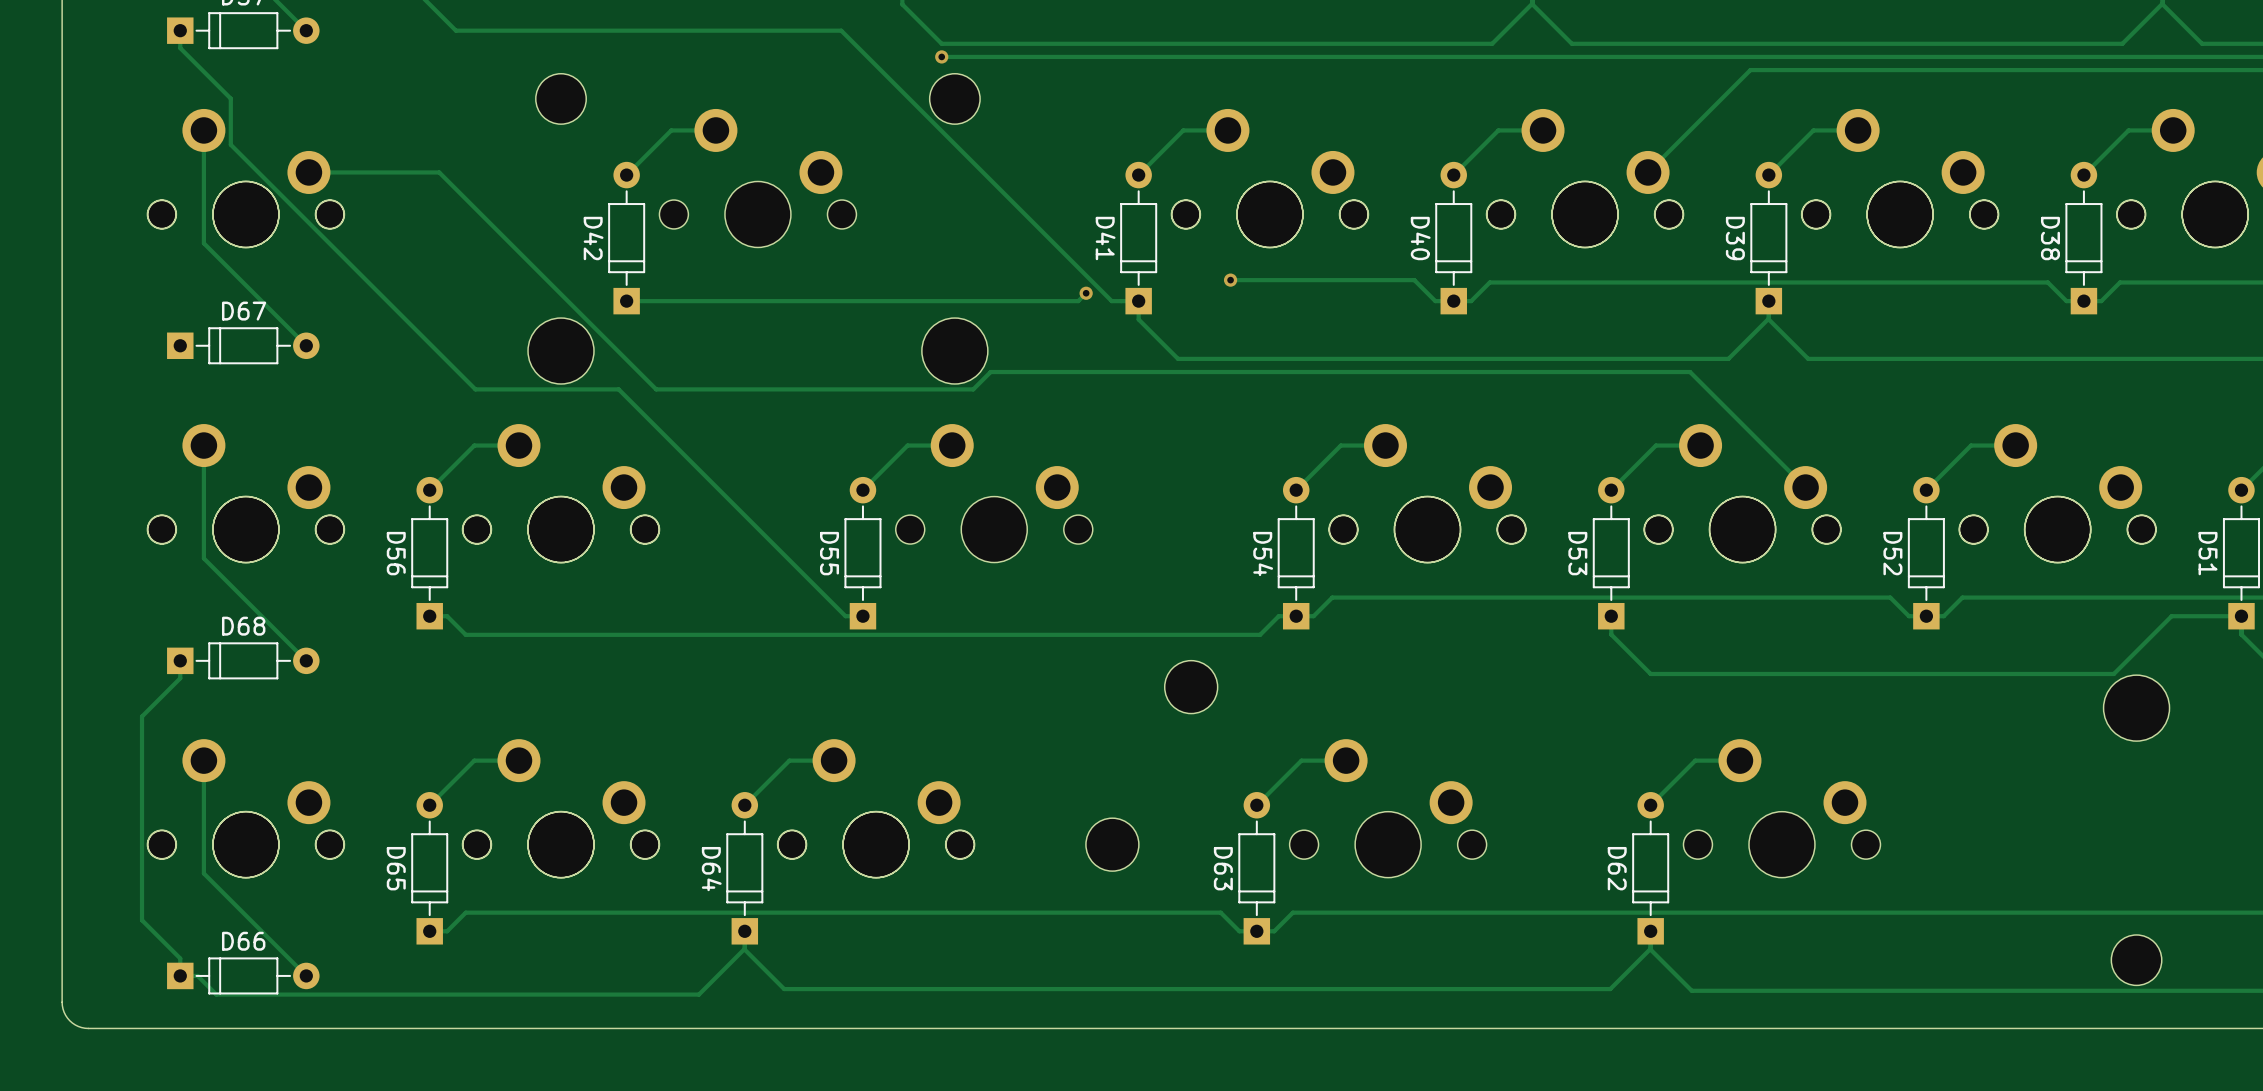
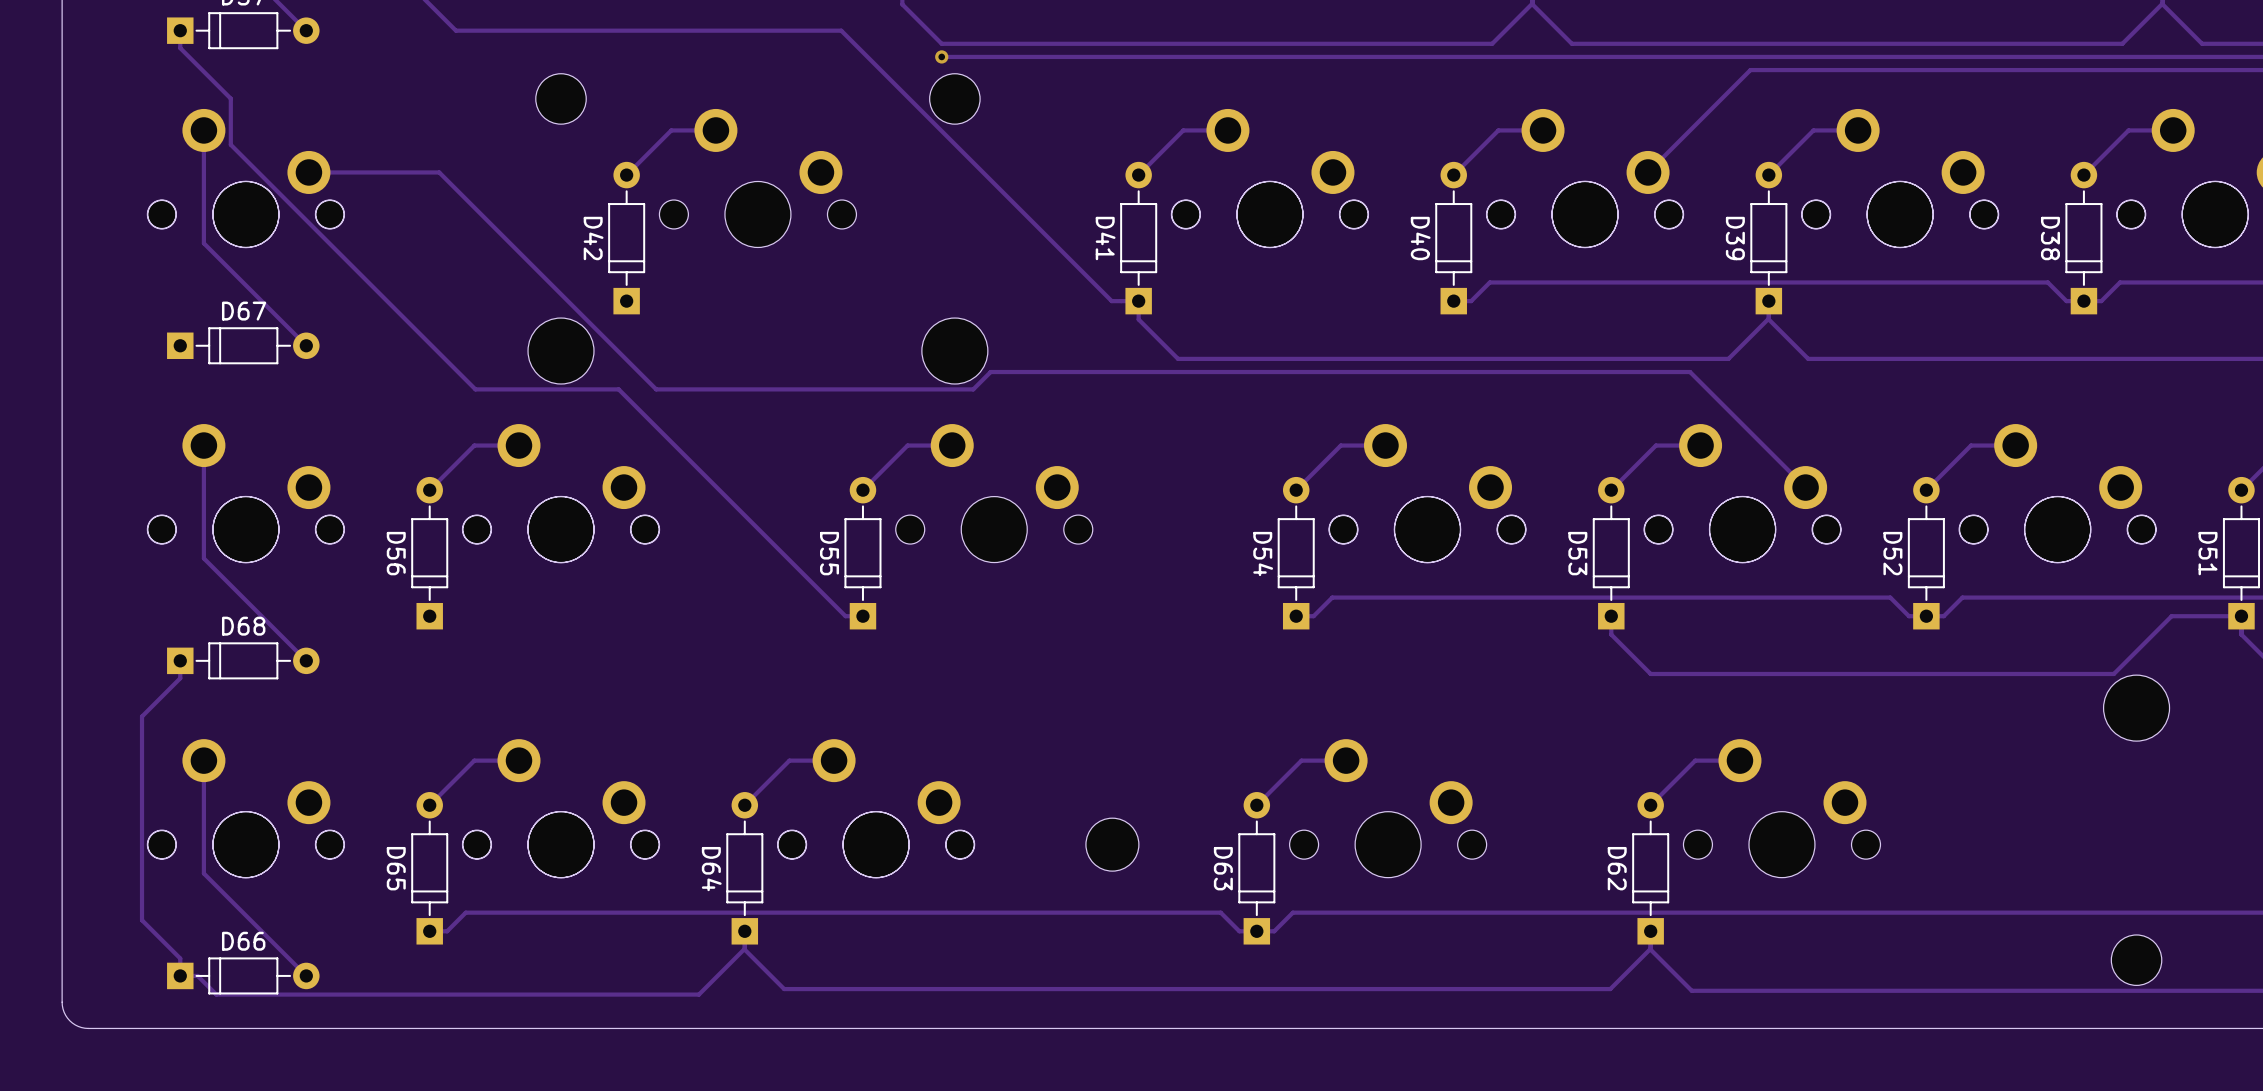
track: (1230, 280) (1414, 280) (1435, 301) (1453, 301) -> none
via: (1230, 280) -> none
track: (1086, 293) (1078, 301) (626, 301) -> none
via: (1086, 293) -> none
track: (1296, 616) (1278, 616) (1260, 634) (465, 634) (447, 616) (429, 616) -> none
part: (1191, 687) -> none

